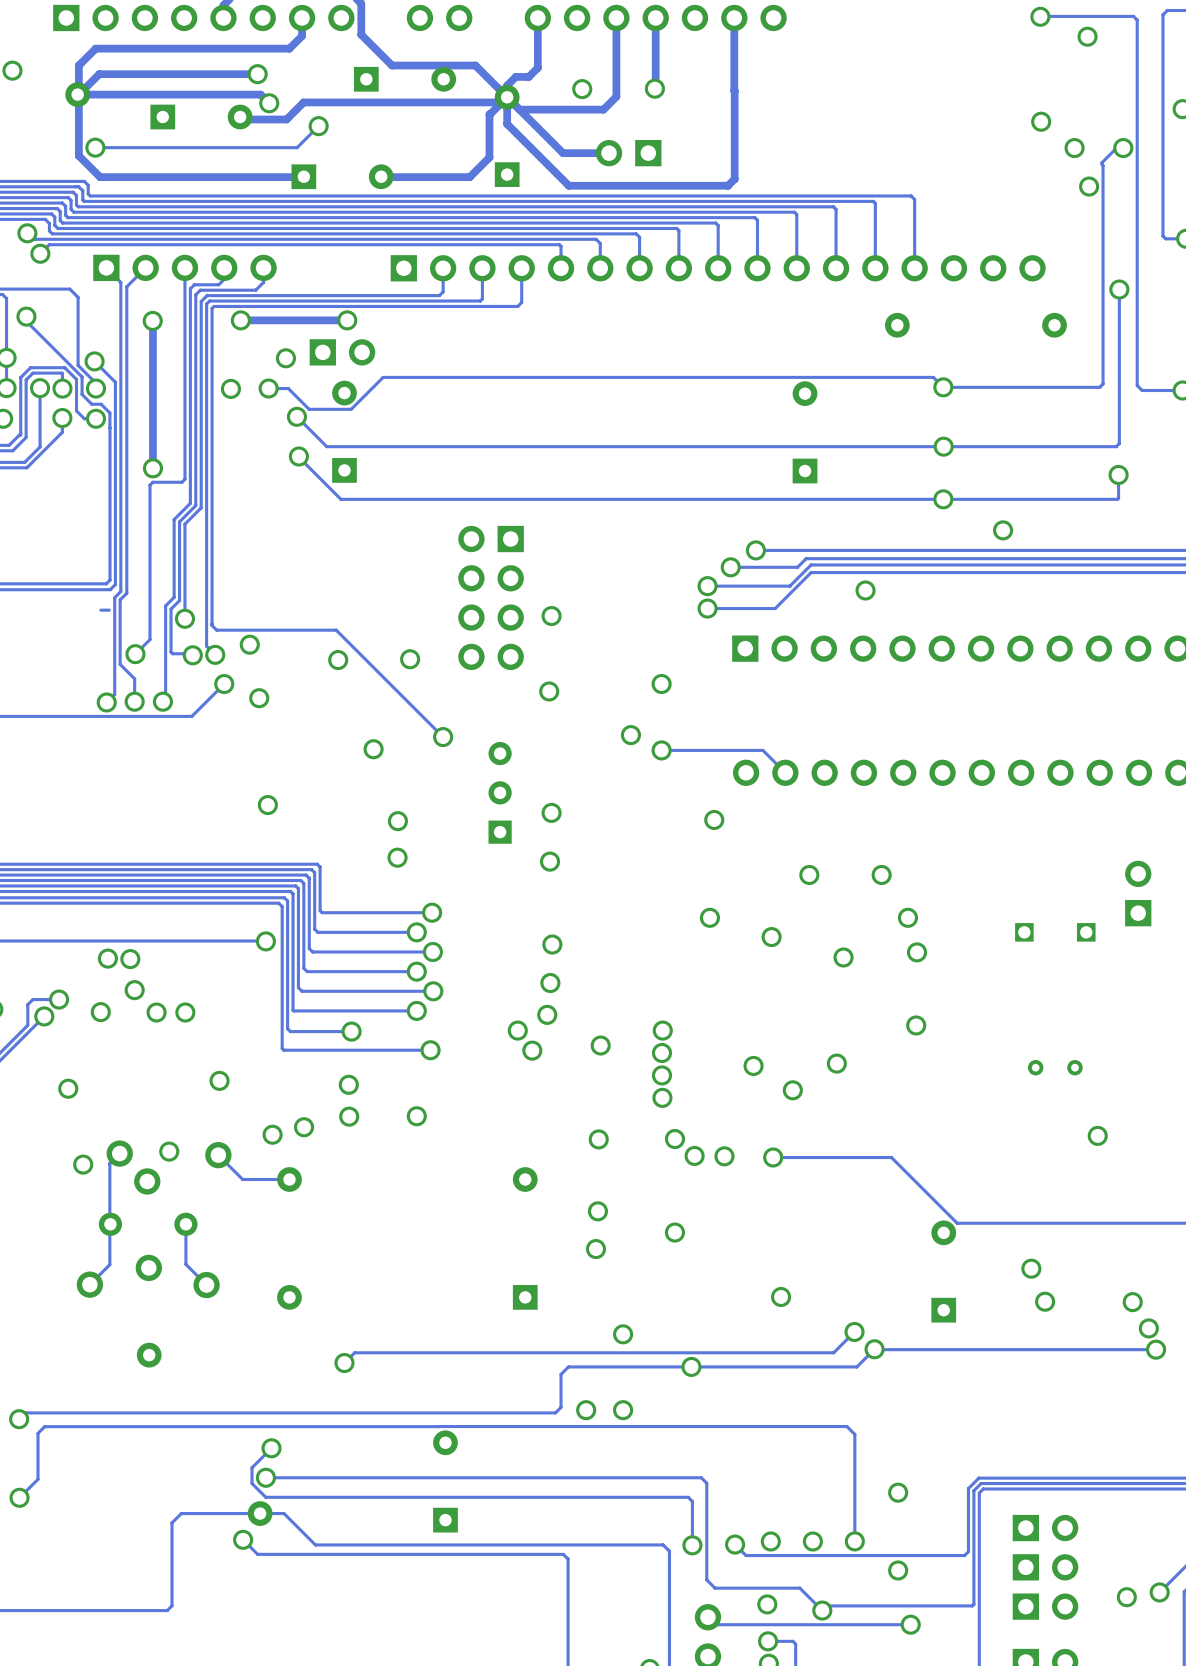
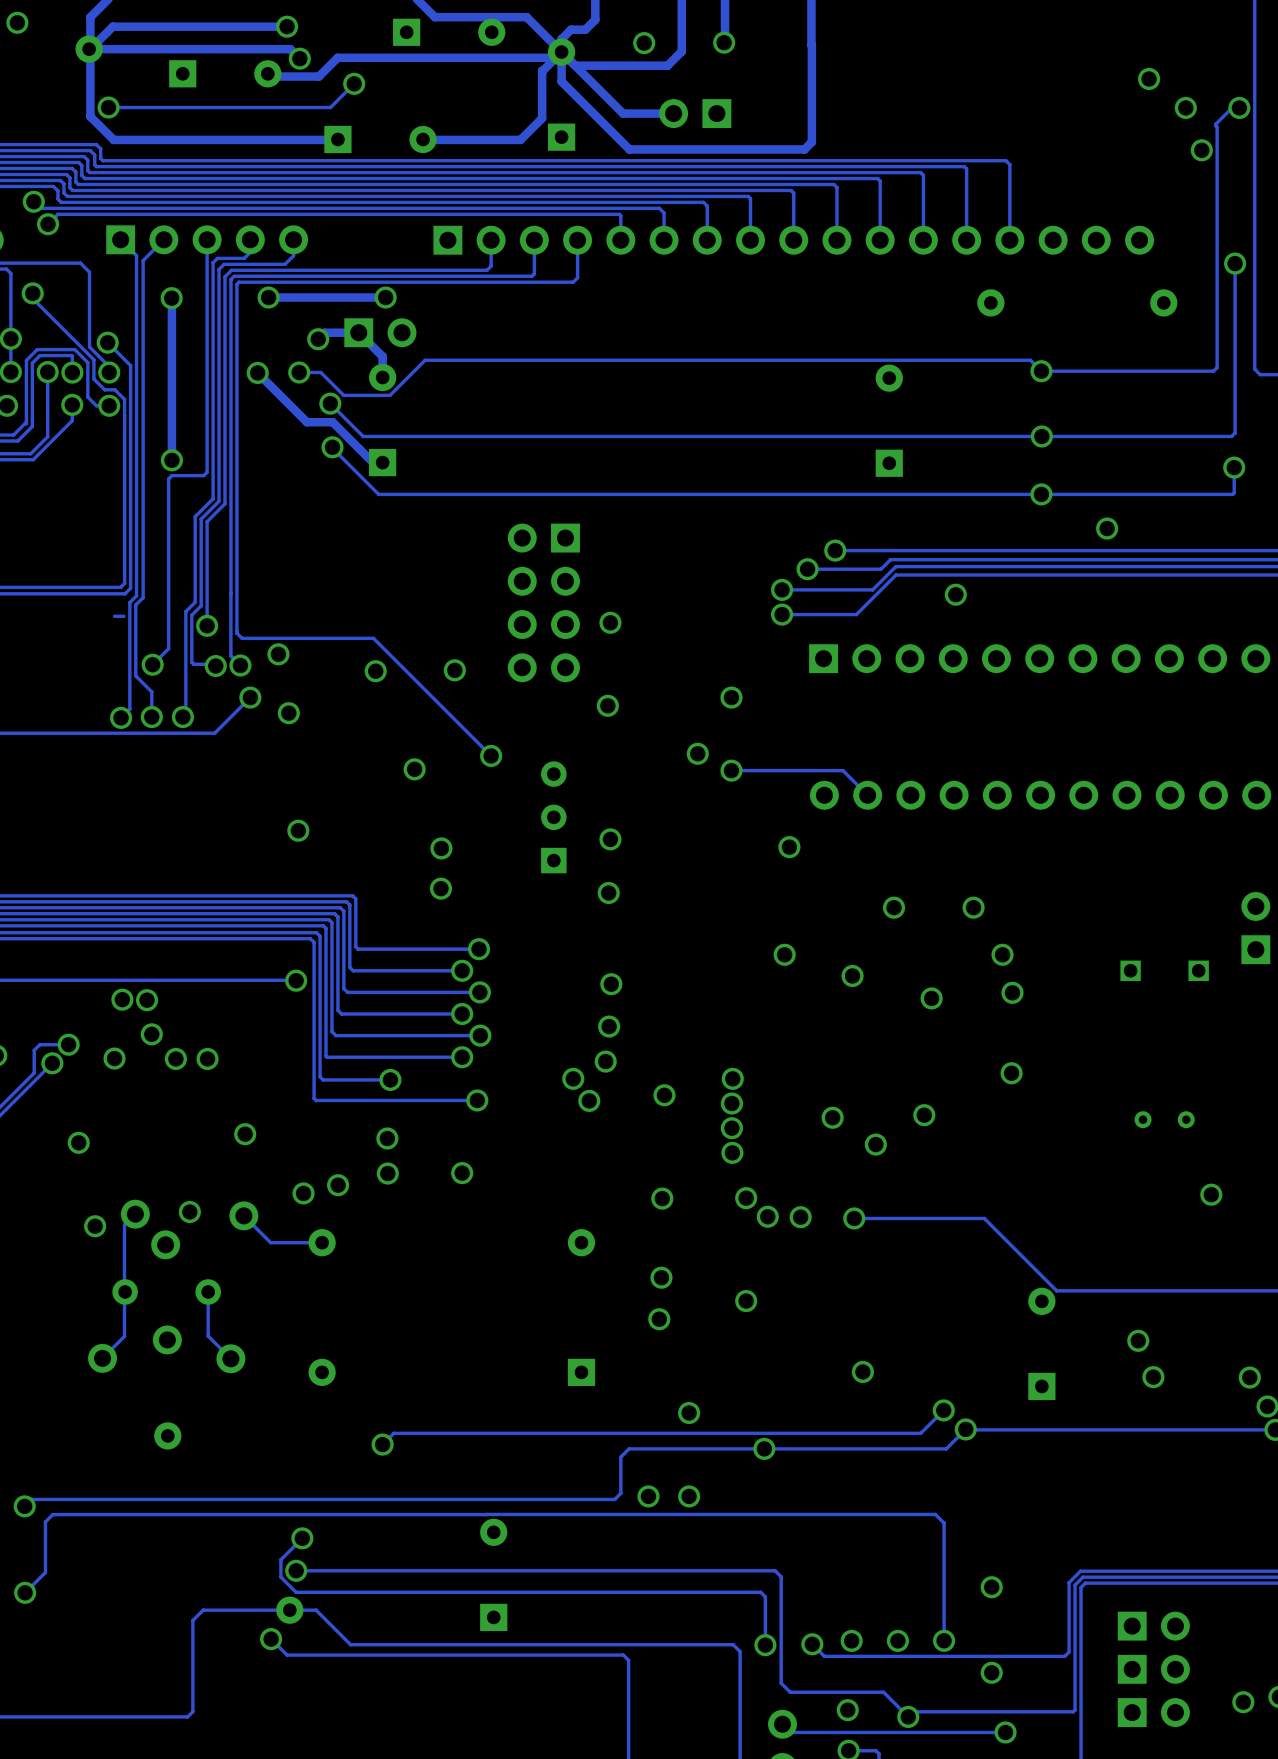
track: none -> (318, 339) (324, 332) (358, 332) (382, 356) (382, 377)
track: none -> (257, 372) (306, 422) (332, 422) (373, 462) (382, 462)

